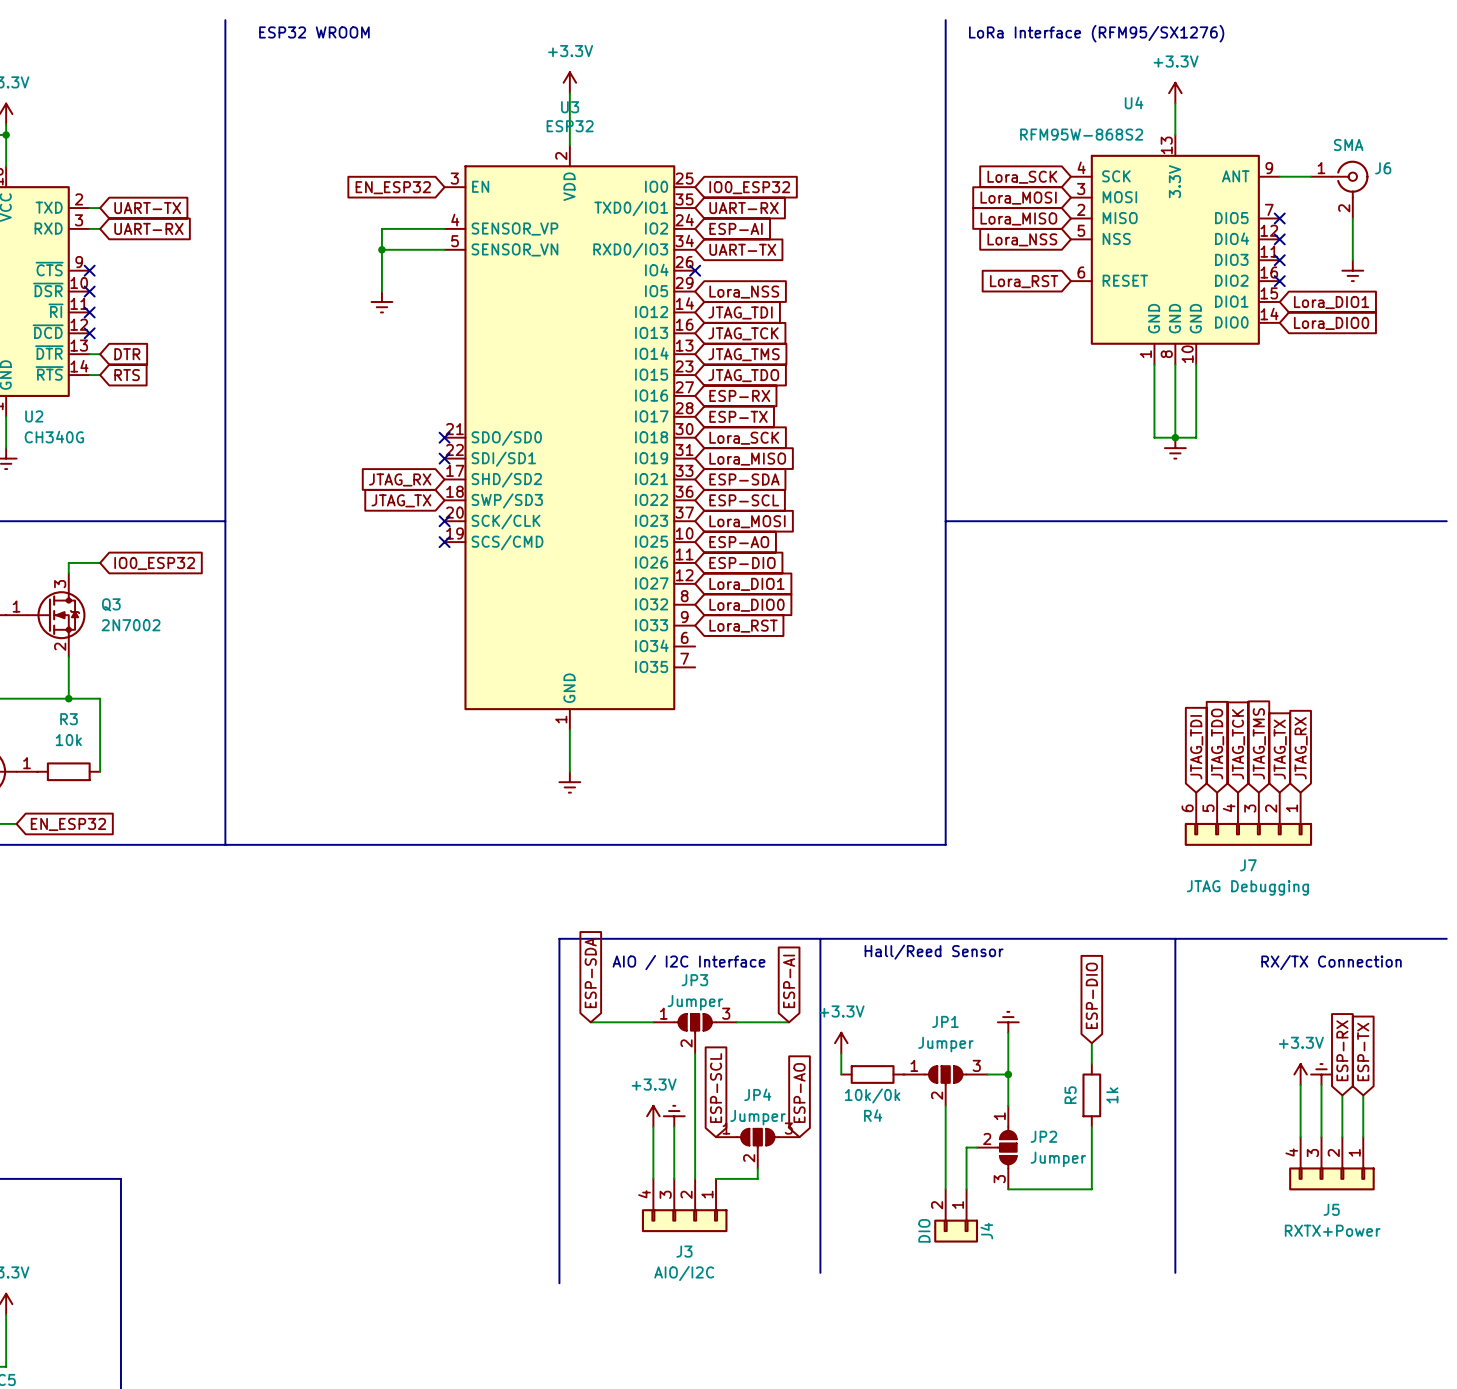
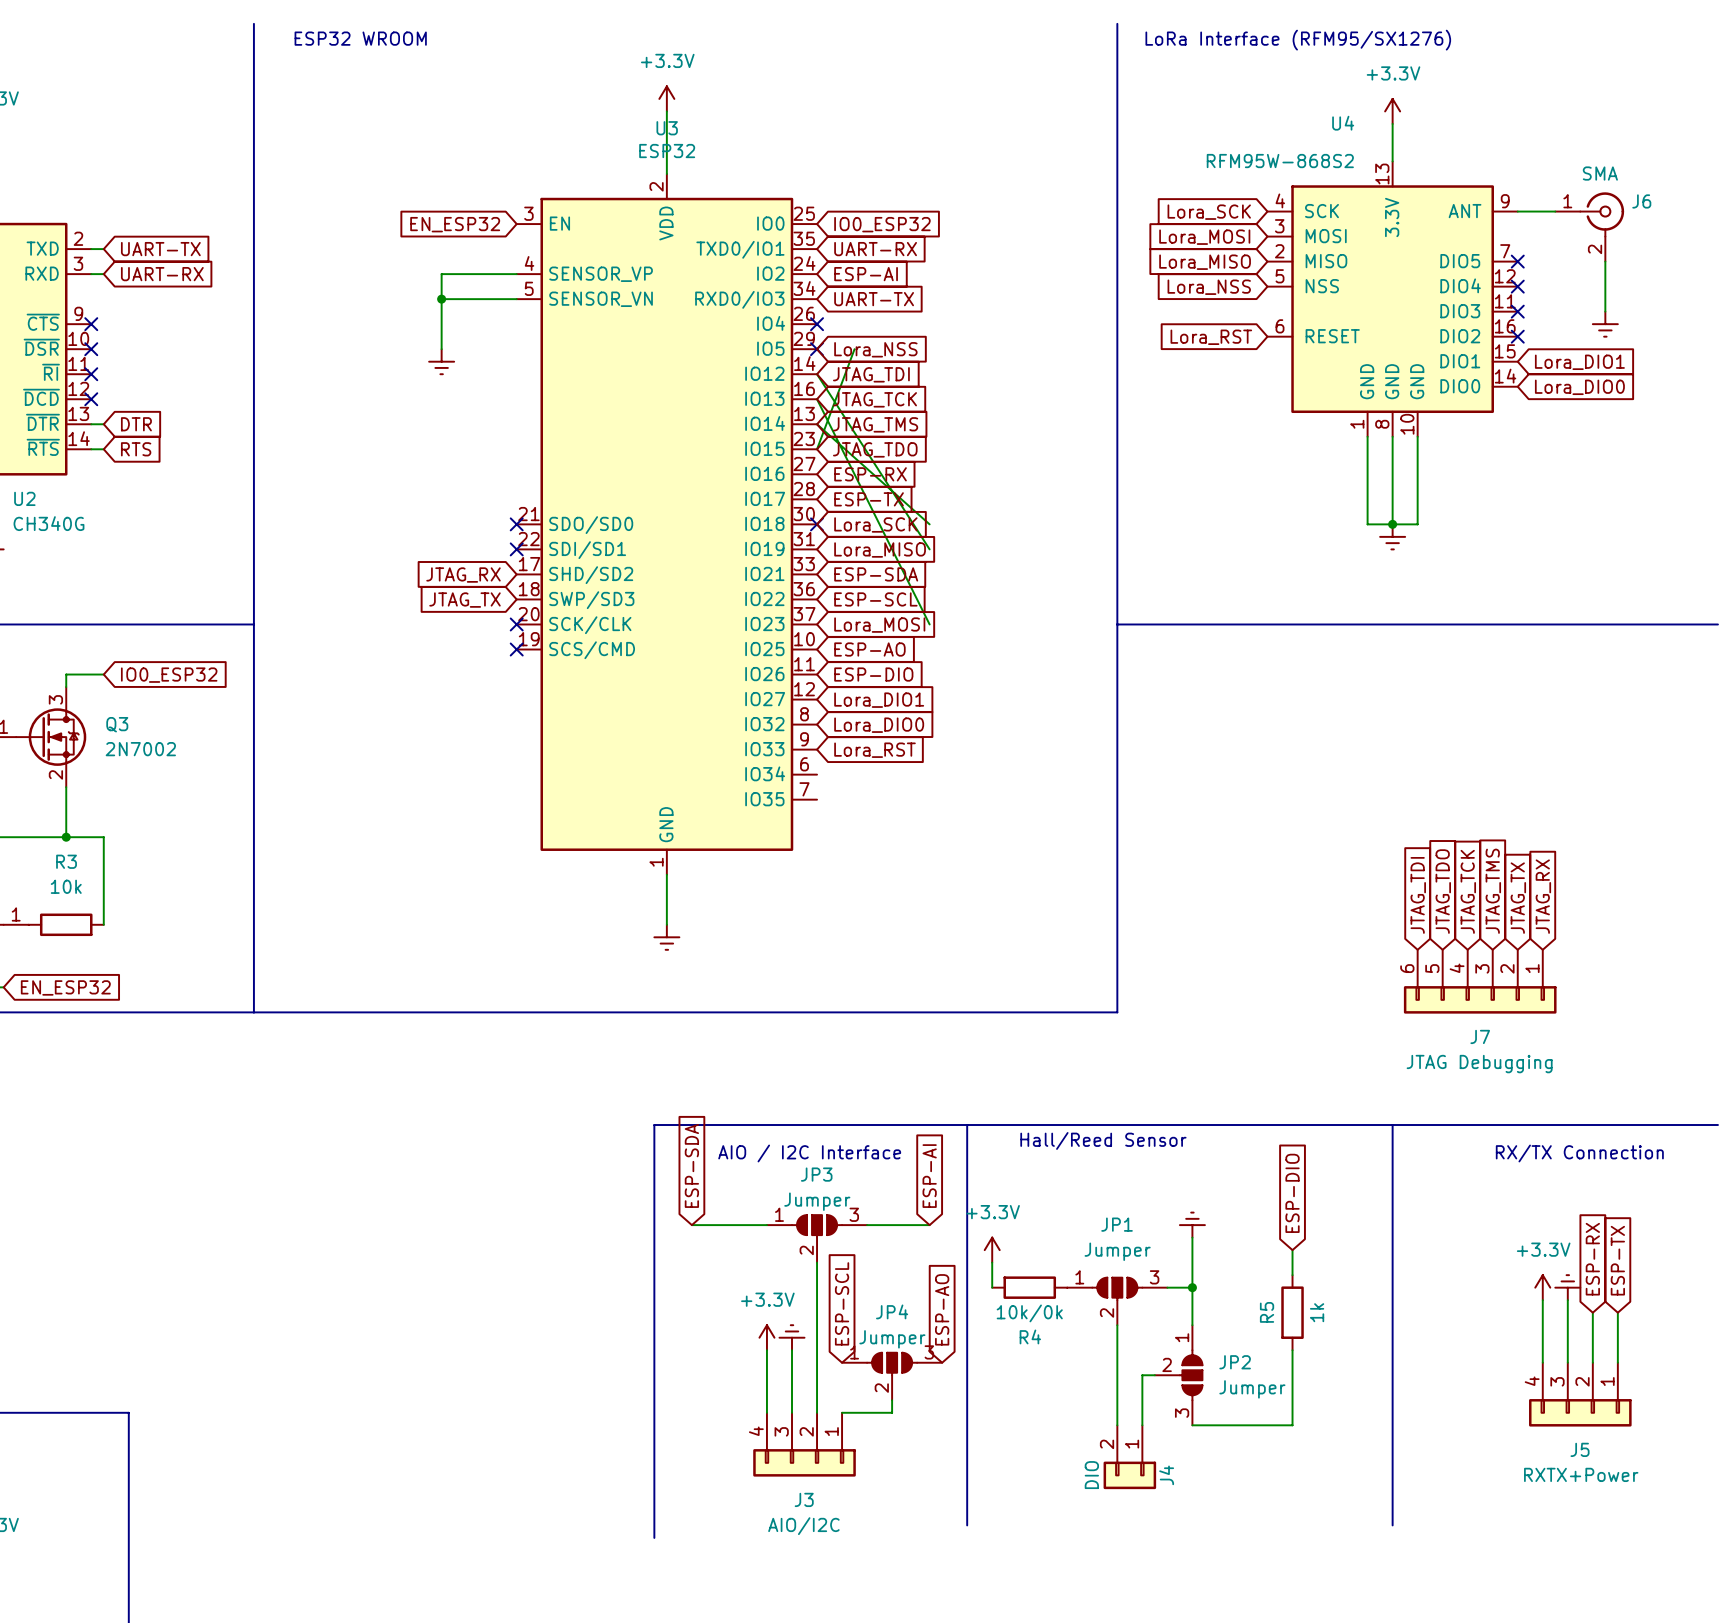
no-connect mark: none -> (817, 349)
wire: none -> (854, 349) (817, 449)
wire: none -> (817, 374) (929, 549)
wire: none -> (817, 399) (929, 624)
wire: none -> (817, 424) (929, 524)
no-connect mark: none -> (817, 524)

